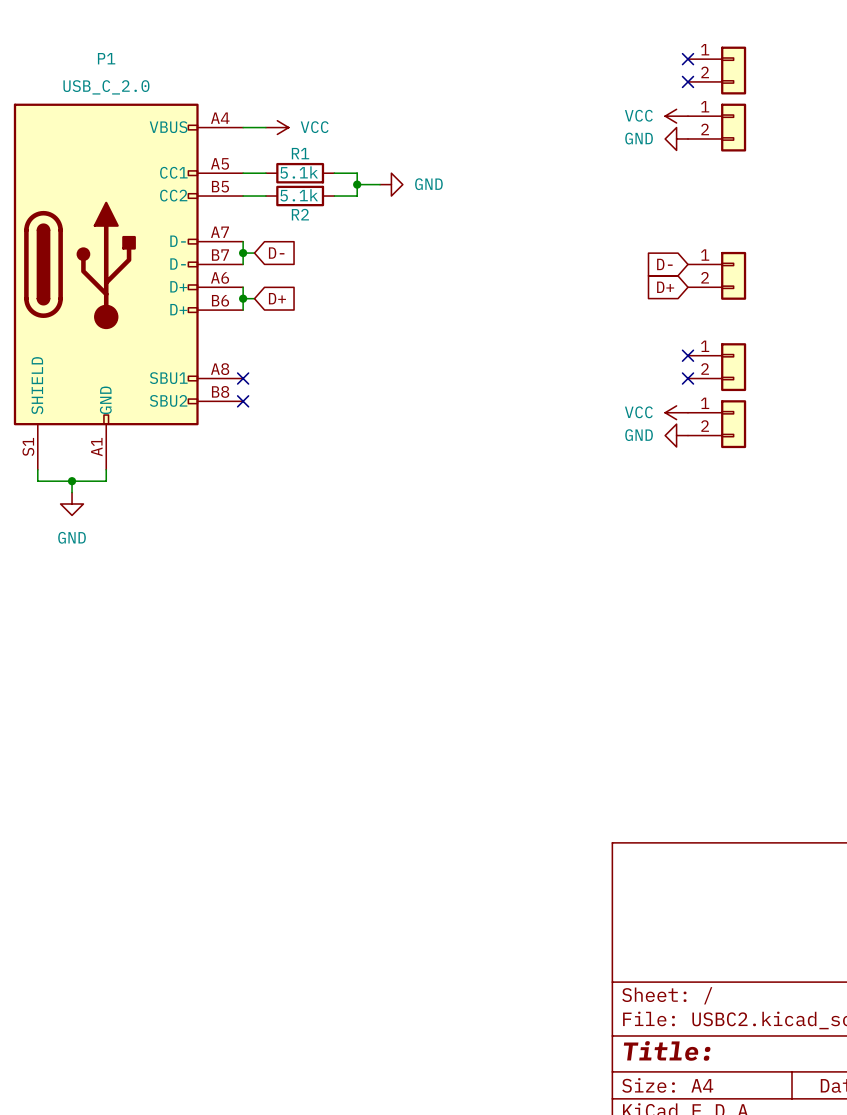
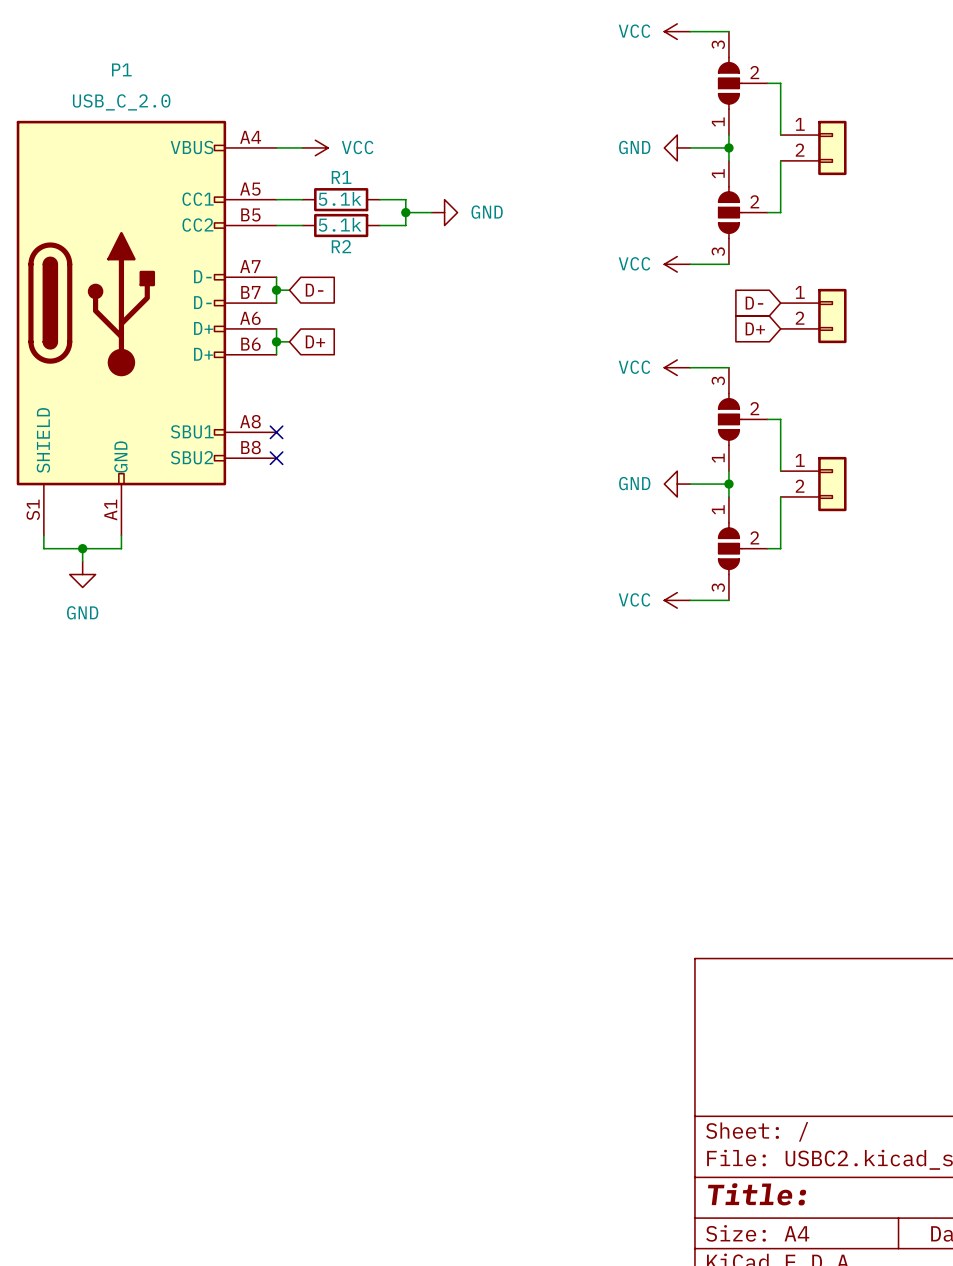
power symbol: none -> VCC (677, 31)
wire: none -> (690, 31) (728, 31)
no-connect mark: (687, 59) -> none
part: none -> (743, 83)
wire: none -> (767, 83) (780, 83) (780, 135)
part: (717, 70) -> none
no-connect mark: (687, 81) -> none
wire: none -> (728, 135) (728, 160)
power symbol: VCC (676, 116) -> none
wire: none -> (690, 147) (728, 147)
junction: none -> (728, 147)
power symbol position: GND (676, 138) -> GND (677, 147)
wire: none -> (780, 160) (780, 212) (767, 212)
part: none -> (743, 212)
power symbol: none -> VCC (677, 264)
wire: none -> (690, 264) (728, 264)
power symbol: none -> VCC (677, 367)
wire: none -> (690, 367) (728, 367)
no-connect mark: (687, 355) -> none
part: none -> (743, 419)
wire: none -> (767, 419) (780, 419) (780, 471)
part: (717, 367) -> none
no-connect mark: (687, 378) -> none
wire: none -> (728, 471) (728, 496)
power symbol: VCC (676, 412) -> none
wire: none -> (690, 484) (728, 484)
junction: none -> (728, 484)
power symbol position: GND (676, 435) -> GND (677, 484)
wire: none -> (780, 496) (780, 548) (767, 548)
part: none -> (743, 548)
power symbol: none -> VCC (677, 600)
wire: none -> (690, 600) (728, 600)

